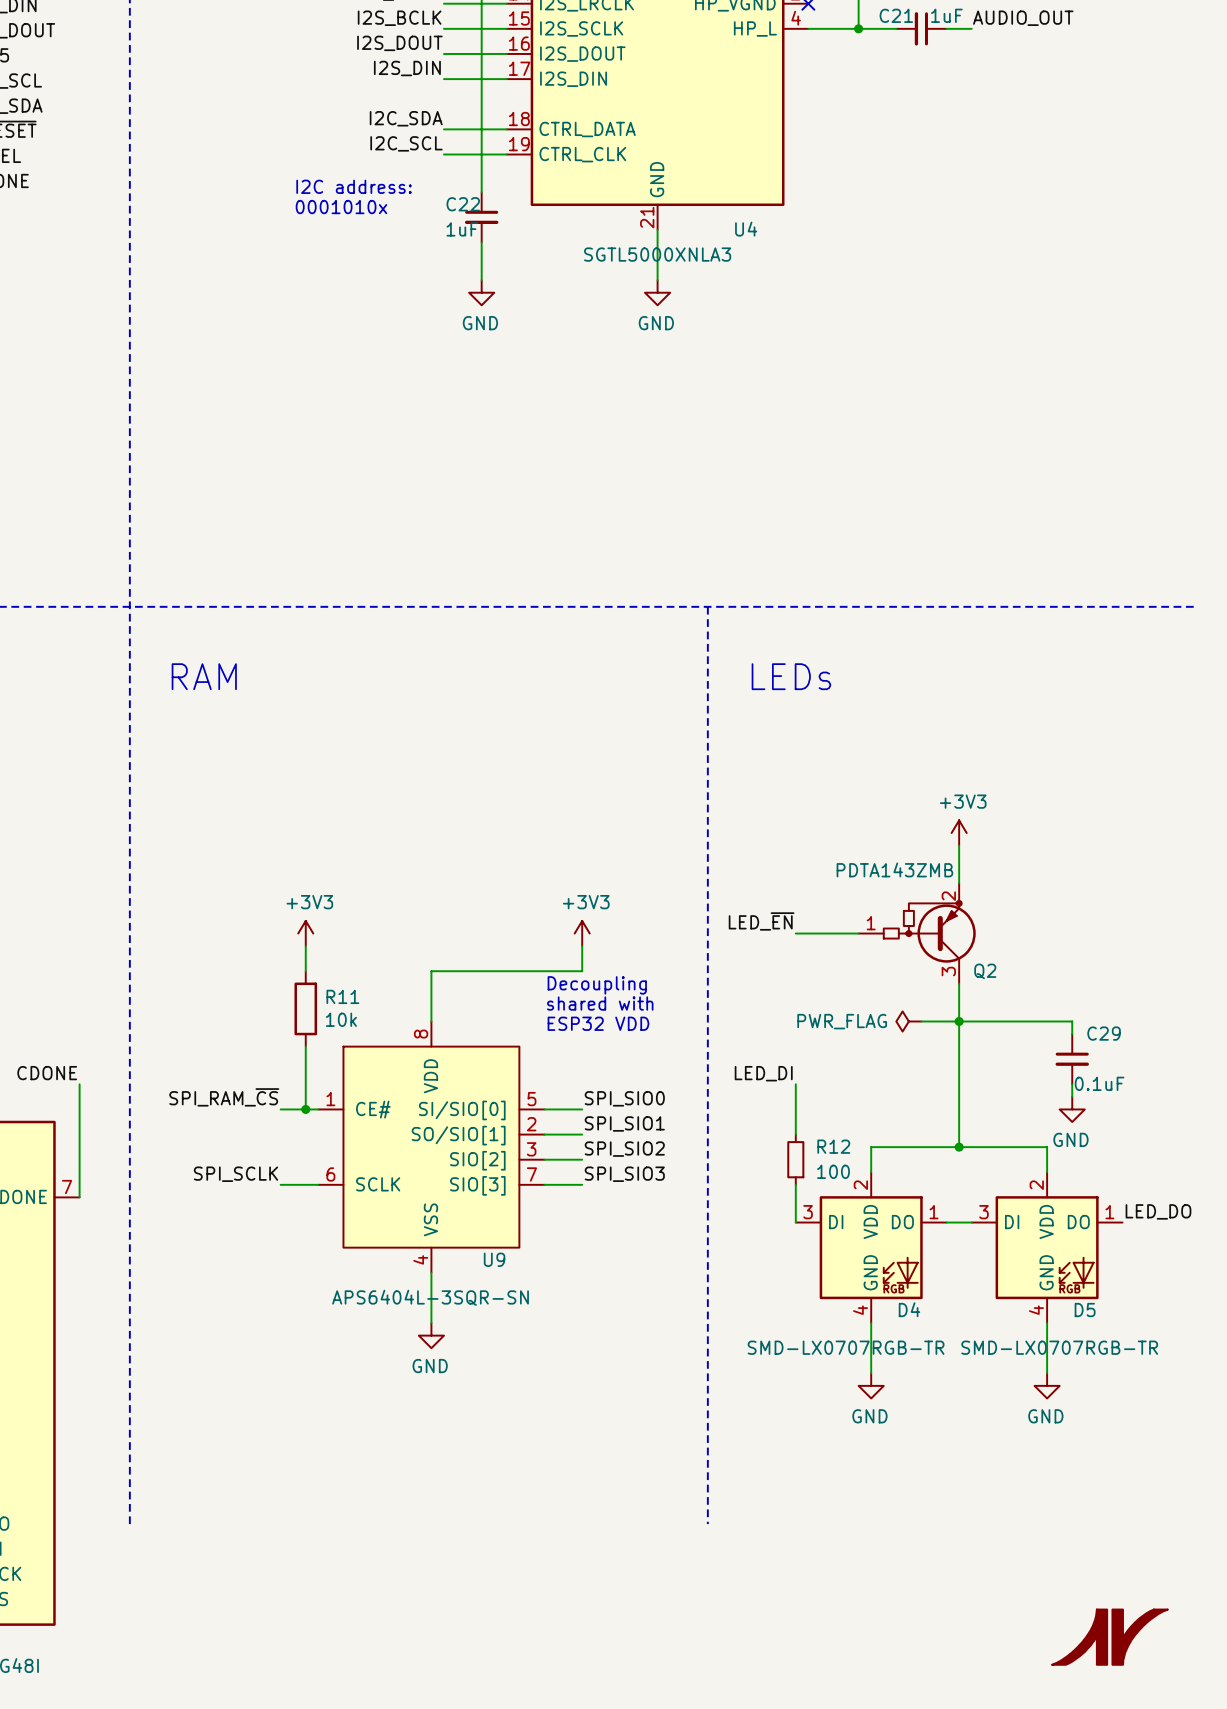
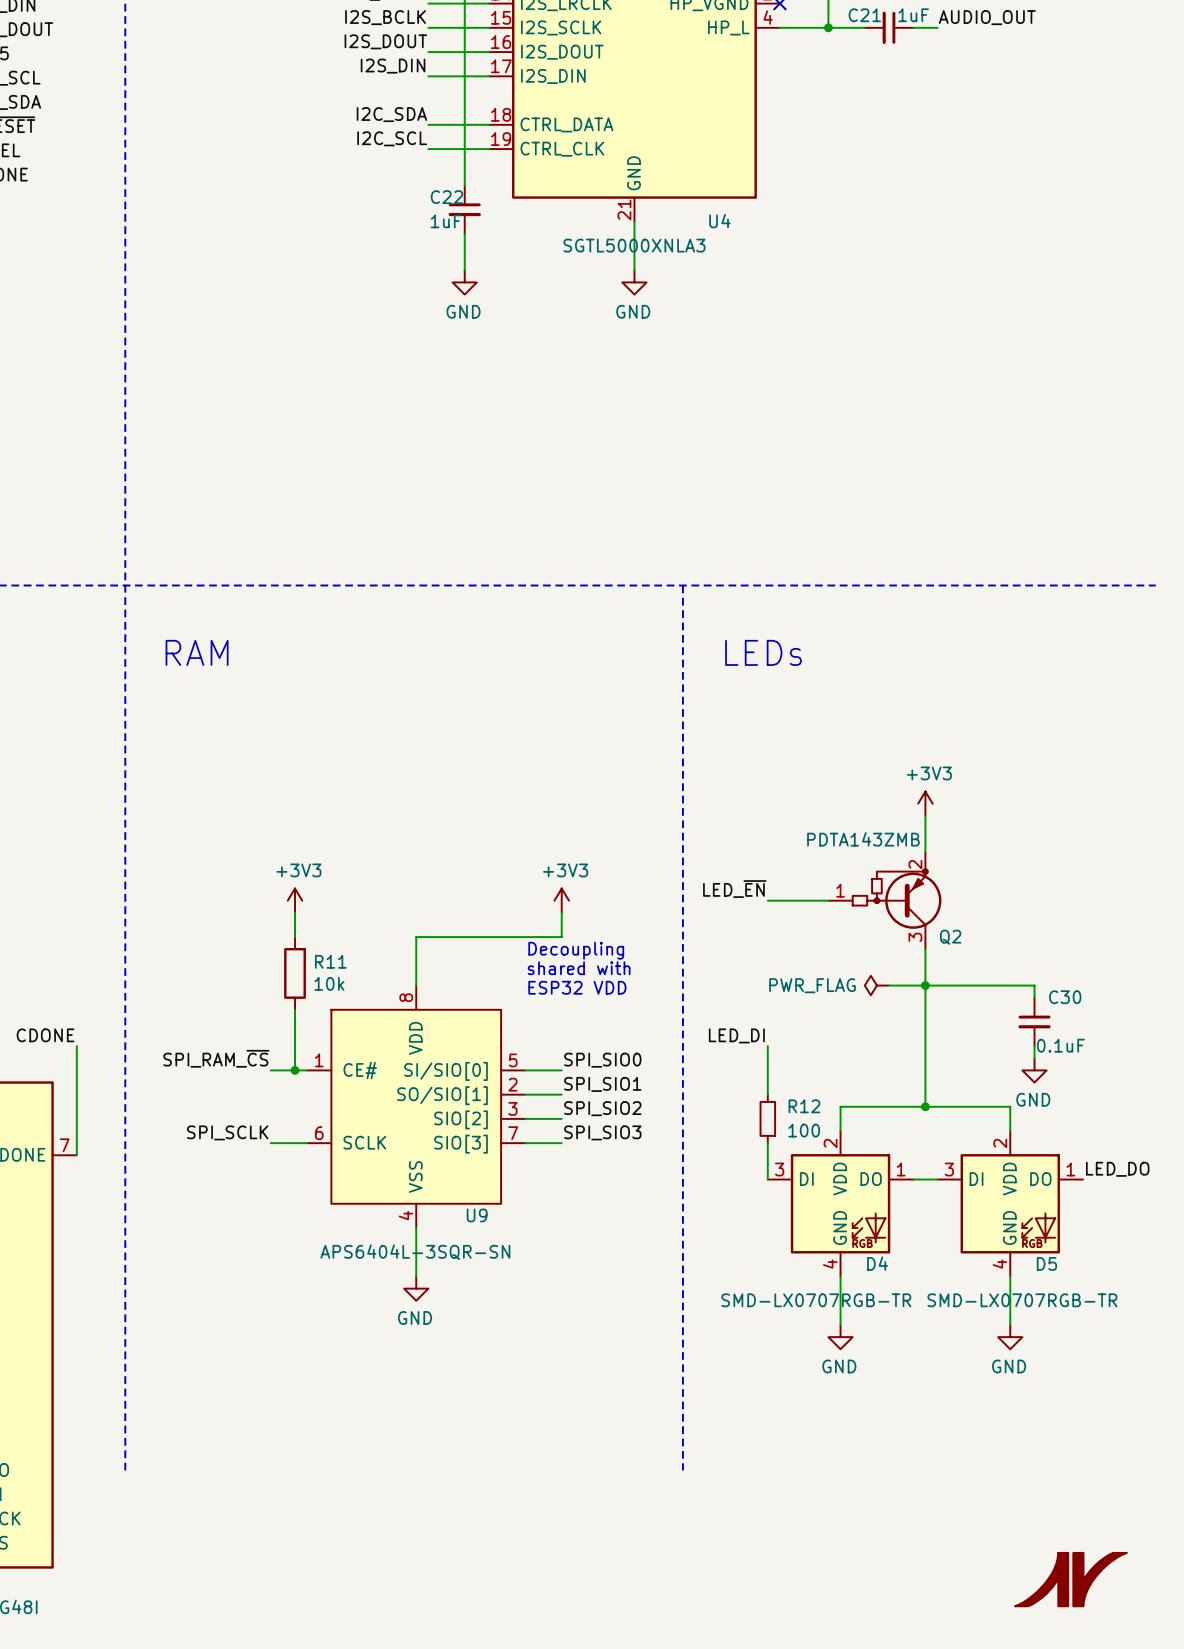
text: I2C address: (354, 186) -> none
text: 0001010x (341, 207) -> none
C29 name: C29 (1104, 1033) -> C30 (1065, 997)

